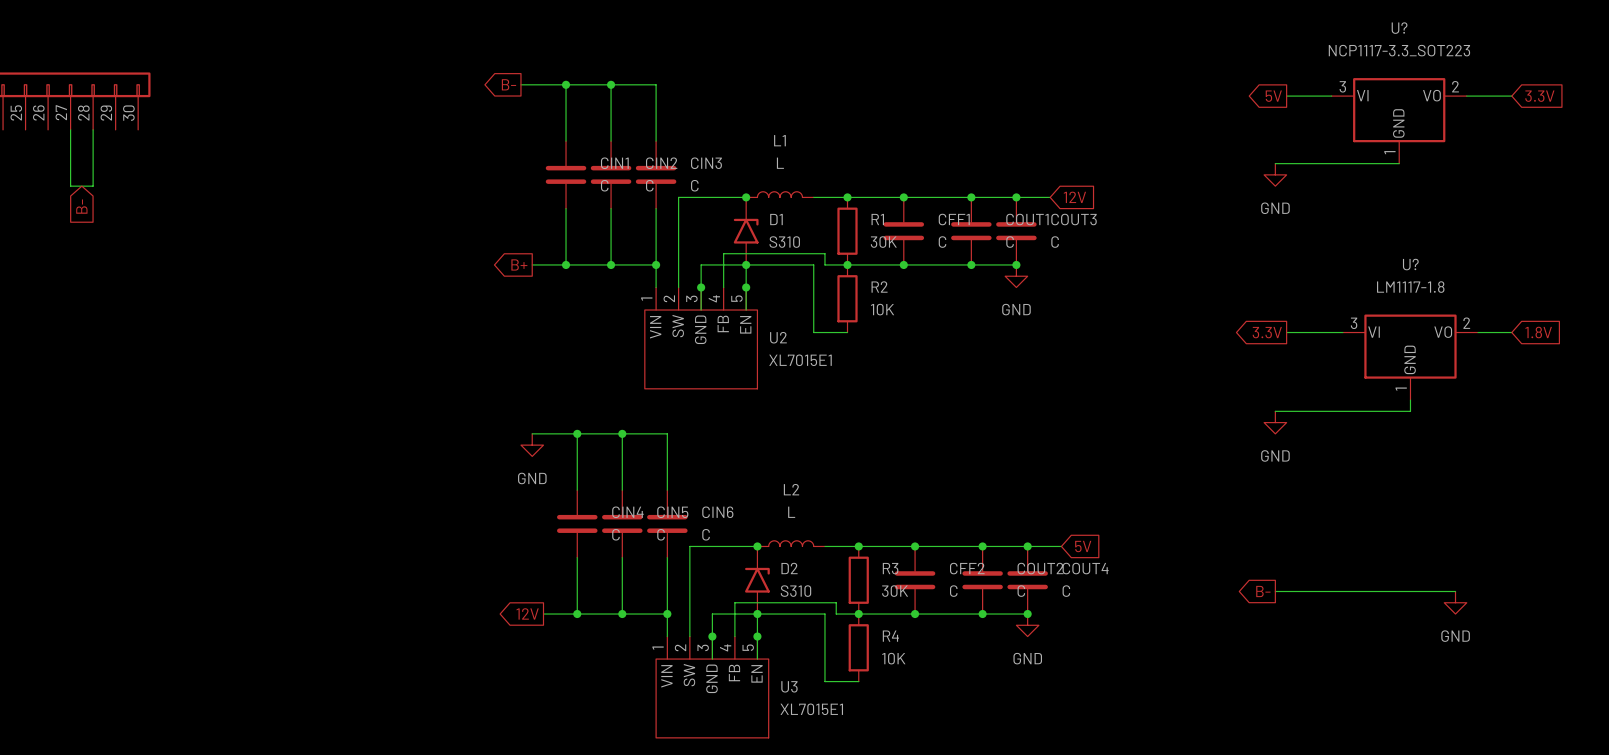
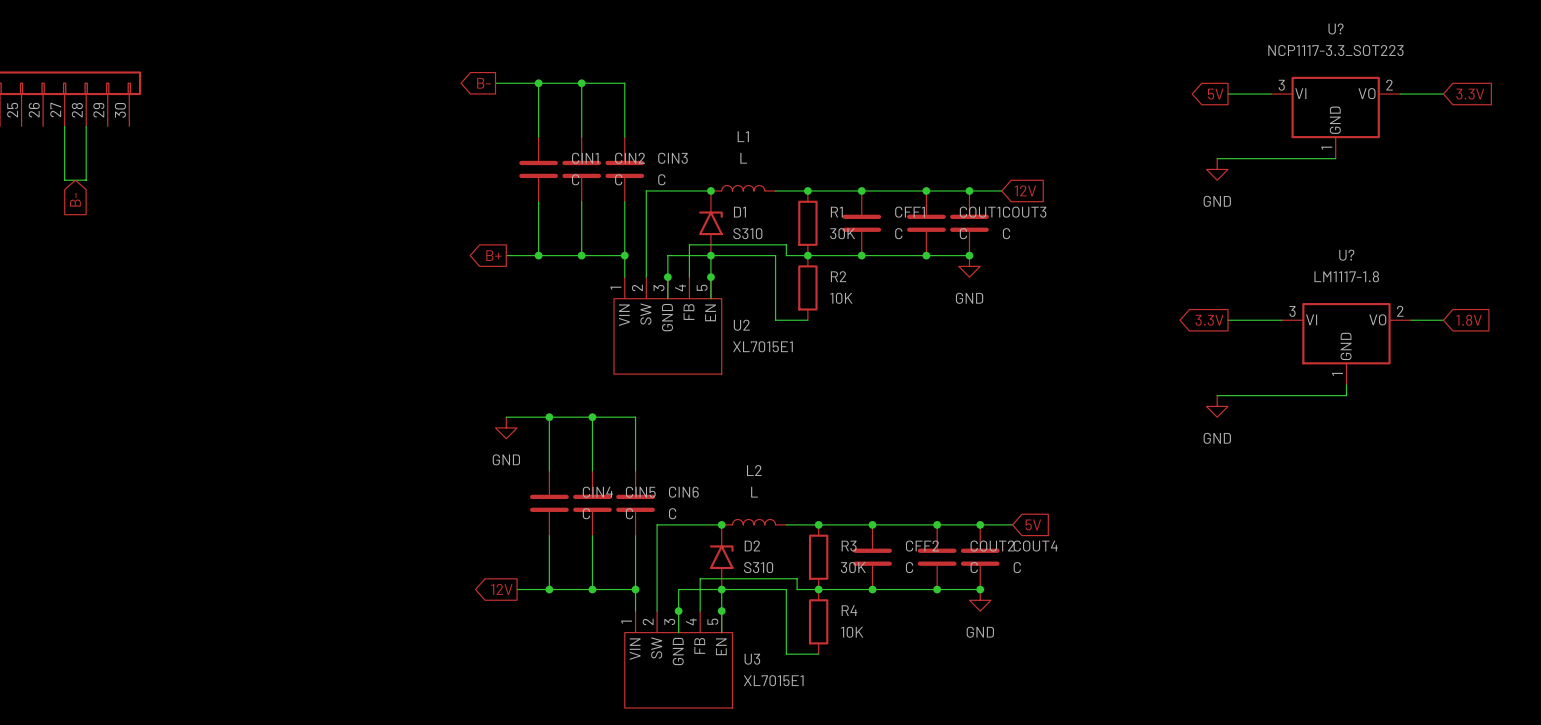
global label: B- (1263, 591) -> none
wire: (1275, 591) (1455, 591) -> none
power symbol: GND (1455, 602) -> none

